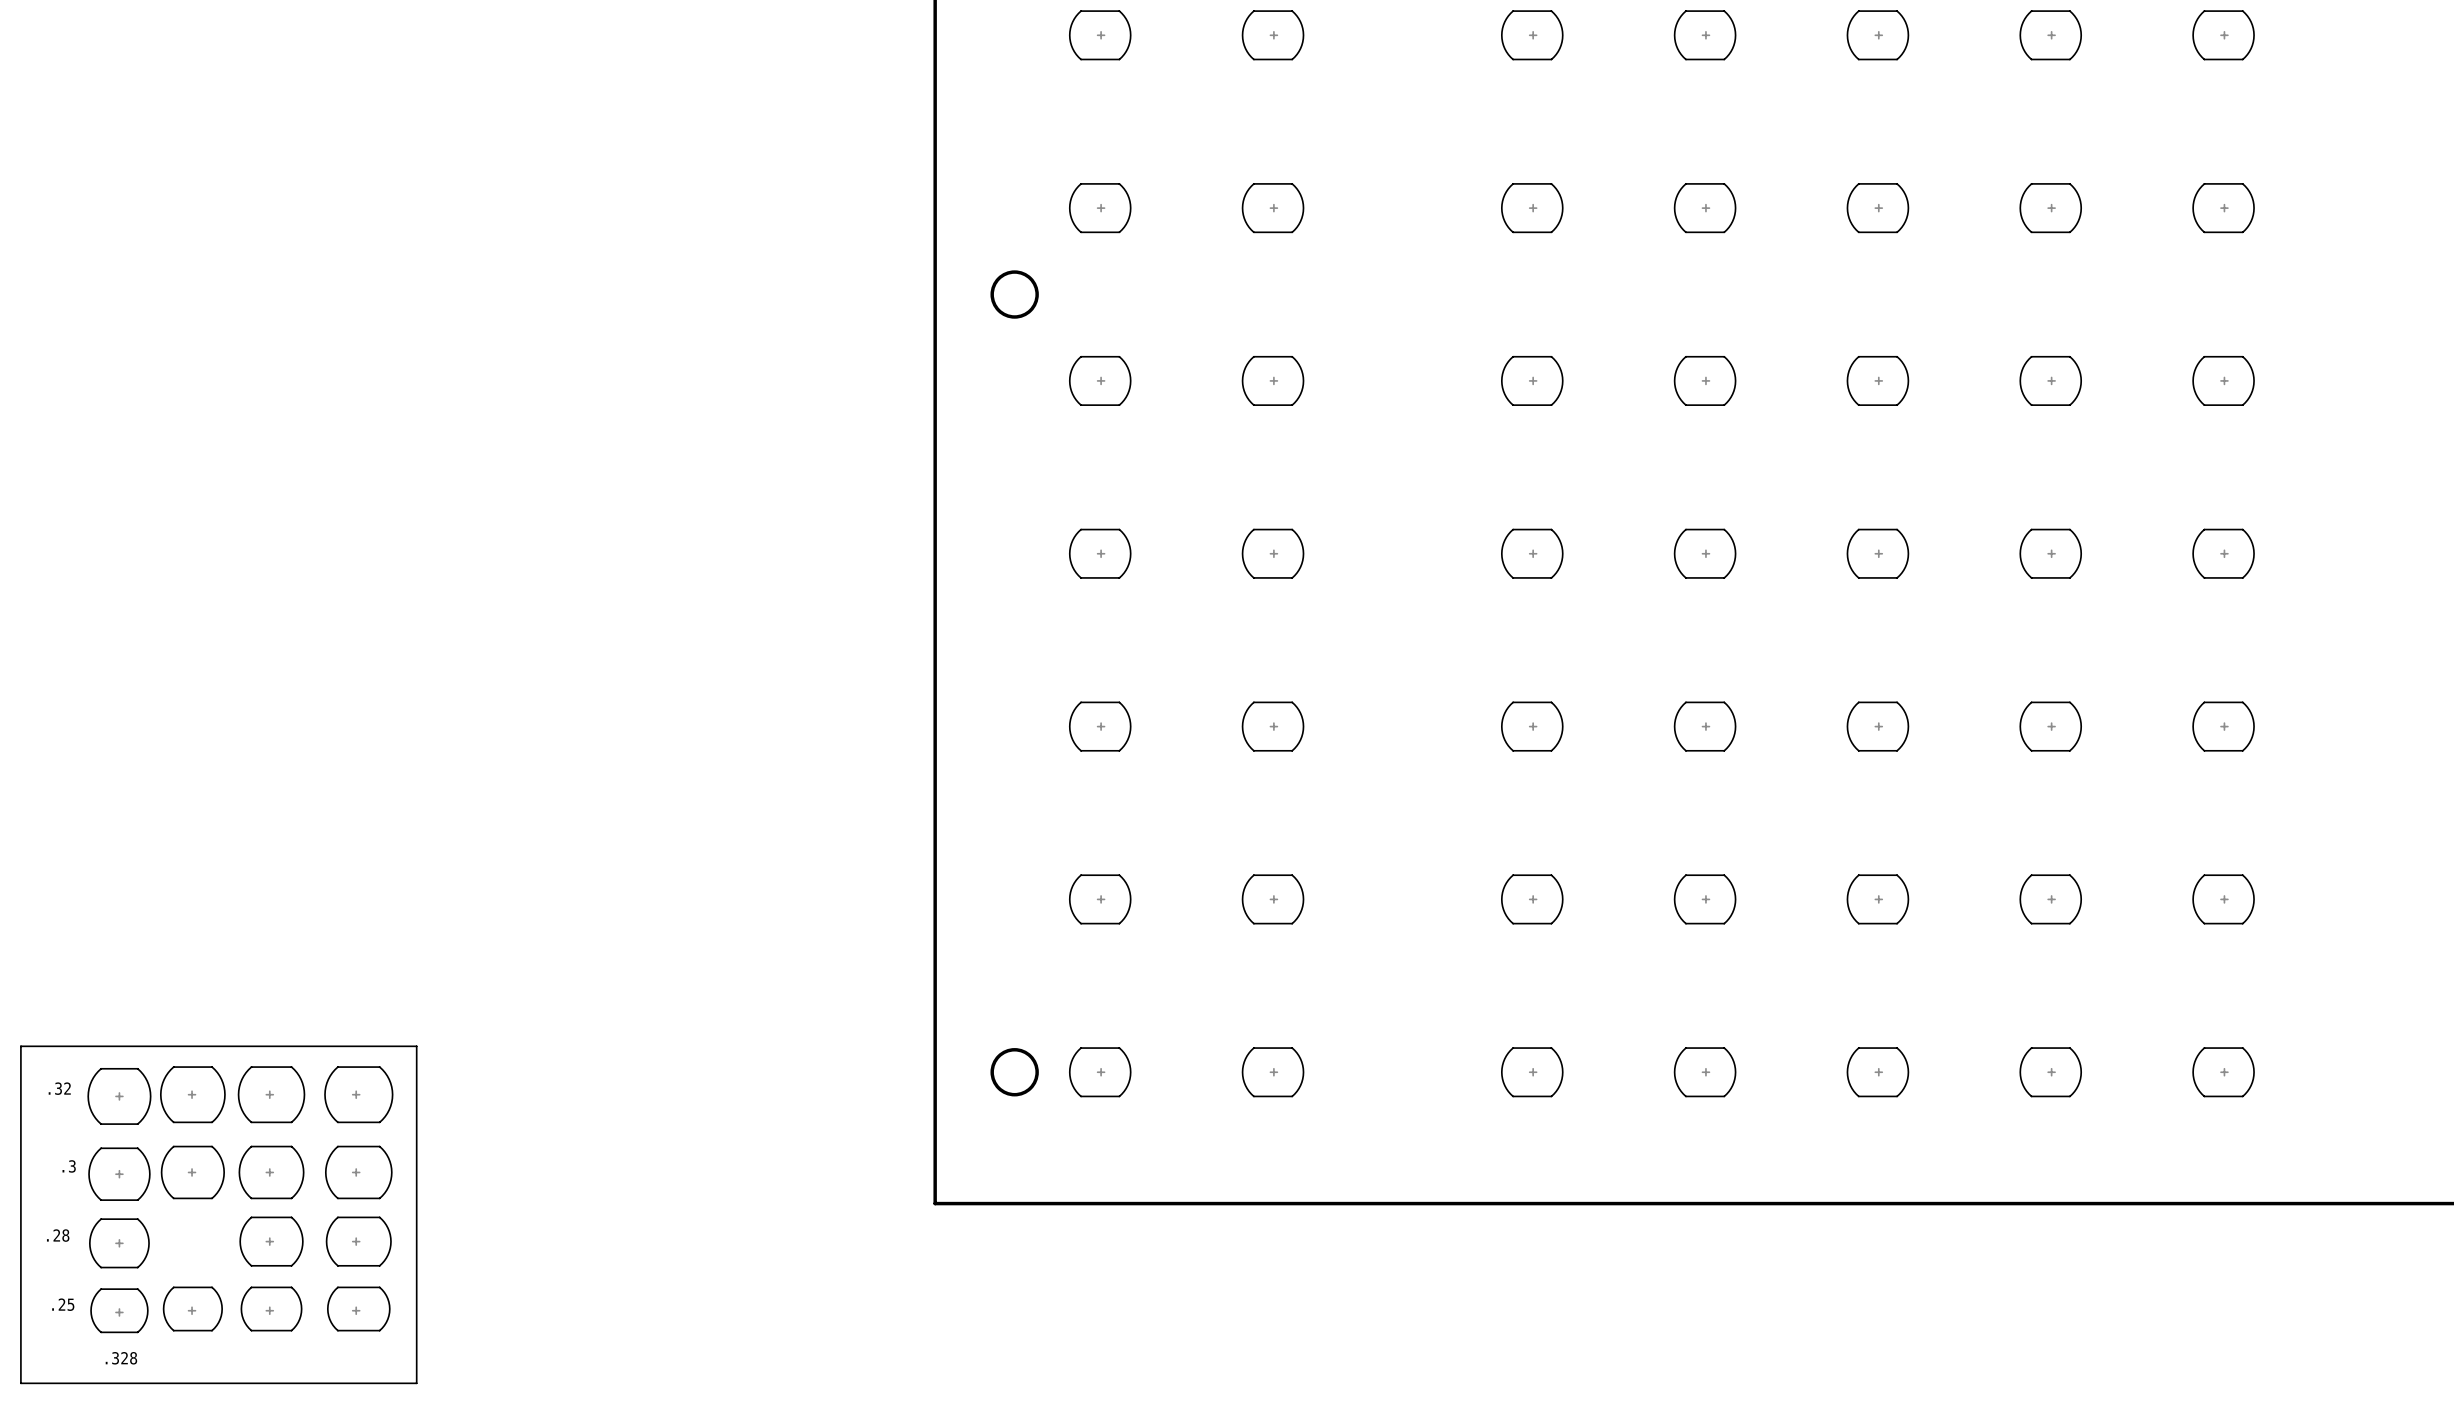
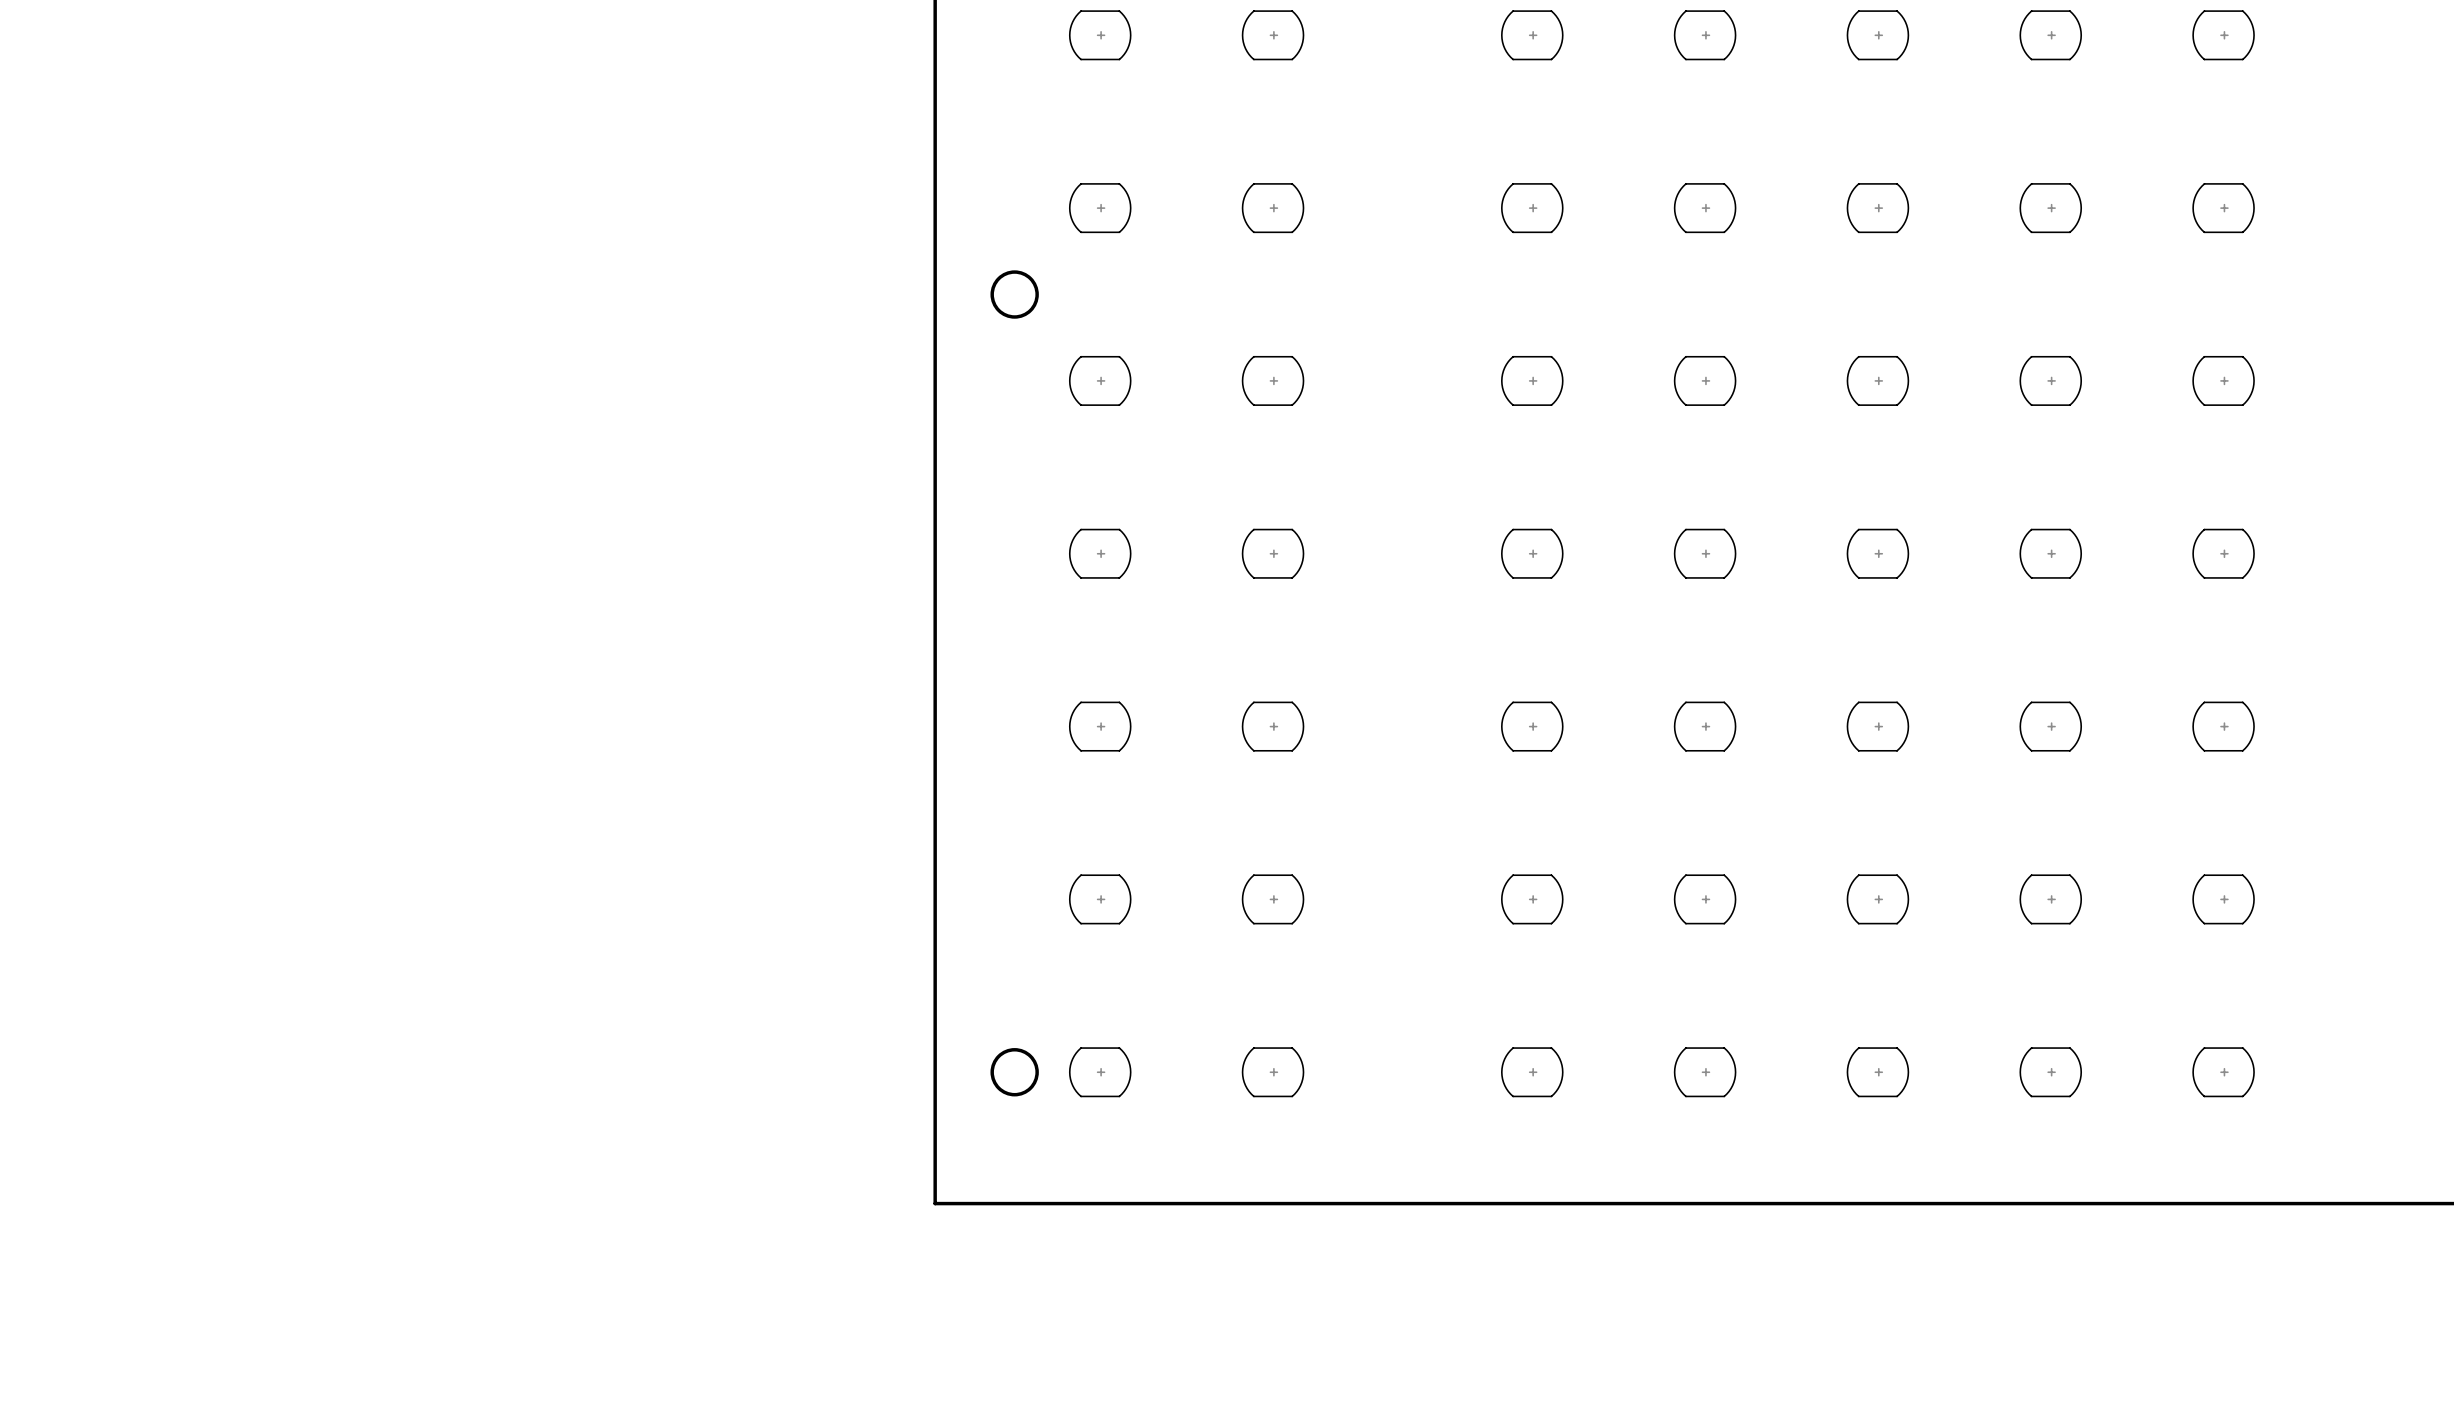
board edge: (20, 1046) (20, 1383) (416, 1383) (416, 1046) (20, 1046) -> none
board edge: (173, 1067) (212, 1067) (217, 1072) (224, 1086) (224, 1098) (219, 1113) (212, 1122) (173, 1122) (168, 1116) (161, 1102) (161, 1090) (166, 1075) (173, 1067) -> none
board edge: (251, 1067) (291, 1067) (297, 1072) (303, 1086) (304, 1098) (299, 1113) (291, 1122) (251, 1122) (246, 1116) (239, 1102) (238, 1090) (243, 1075) (251, 1067) -> none
board edge: (337, 1067) (379, 1067) (385, 1072) (391, 1086) (392, 1098) (387, 1113) (379, 1122) (337, 1122) (332, 1116) (325, 1102) (325, 1090) (330, 1075) (337, 1067) -> none
board edge: (101, 1068) (137, 1068) (145, 1077) (149, 1088) (149, 1104) (145, 1115) (137, 1124) (101, 1124) (93, 1115) (89, 1104) (89, 1088) (93, 1077) (101, 1068) -> none
text: .32 (59, 1088) -> none
line: (192, 1091) (192, 1098) -> none
line: (269, 1091) (269, 1098) -> none
line: (356, 1091) (356, 1098) -> none
line: (119, 1092) (119, 1099) -> none
line: (188, 1094) (195, 1094) -> none
line: (266, 1094) (273, 1094) -> none
line: (352, 1094) (359, 1094) -> none
line: (115, 1096) (122, 1096) -> none
board edge: (173, 1146) (212, 1146) (217, 1151) (222, 1161) (223, 1176) (219, 1190) (212, 1198) (173, 1198) (168, 1193) (163, 1183) (161, 1168) (166, 1154) (173, 1146) -> none
board edge: (251, 1146) (291, 1146) (296, 1151) (301, 1161) (303, 1176) (298, 1190) (291, 1198) (251, 1198) (246, 1193) (241, 1183) (239, 1168) (244, 1154) (251, 1146) -> none
board edge: (337, 1146) (379, 1146) (384, 1151) (390, 1161) (391, 1176) (386, 1190) (379, 1198) (337, 1198) (332, 1193) (327, 1183) (325, 1168) (330, 1154) (337, 1146) -> none
board edge: (101, 1148) (137, 1148) (142, 1153) (148, 1163) (149, 1177) (144, 1191) (137, 1200) (101, 1200) (96, 1194) (90, 1185) (89, 1170) (93, 1156) (101, 1148) -> none
text: .3 (69, 1166) -> none
line: (192, 1169) (192, 1175) -> none
line: (269, 1169) (269, 1175) -> none
line: (356, 1169) (356, 1175) -> none
line: (119, 1170) (119, 1177) -> none
line: (188, 1172) (195, 1172) -> none
line: (266, 1172) (273, 1172) -> none
line: (352, 1172) (359, 1172) -> none
line: (115, 1174) (122, 1174) -> none
board edge: (251, 1217) (291, 1217) (296, 1222) (302, 1234) (302, 1245) (298, 1257) (291, 1265) (251, 1265) (246, 1260) (240, 1248) (240, 1238) (244, 1225) (251, 1217) -> none
board edge: (337, 1217) (379, 1217) (382, 1219) (388, 1228) (390, 1241) (388, 1254) (379, 1265) (337, 1265) (335, 1263) (329, 1254) (326, 1241) (329, 1228) (337, 1217) -> none
board edge: (101, 1219) (137, 1219) (142, 1224) (148, 1236) (148, 1246) (144, 1259) (137, 1267) (101, 1267) (96, 1262) (90, 1250) (90, 1239) (94, 1226) (101, 1219) -> none
text: .28 (58, 1235) -> none
line: (269, 1238) (269, 1245) -> none
line: (356, 1238) (356, 1245) -> none
line: (119, 1239) (119, 1246) -> none
line: (266, 1241) (273, 1241) -> none
line: (352, 1241) (359, 1241) -> none
line: (115, 1243) (122, 1243) -> none
board edge: (173, 1287) (212, 1287) (214, 1289) (221, 1302) (221, 1312) (218, 1322) (212, 1330) (173, 1330) (171, 1328) (164, 1315) (163, 1305) (167, 1295) (173, 1287) -> none
board edge: (251, 1287) (291, 1287) (294, 1289) (299, 1298) (301, 1309) (299, 1319) (294, 1328) (291, 1330) (251, 1330) (248, 1328) (242, 1315) (241, 1305) (244, 1295) (251, 1287) -> none
board edge: (337, 1287) (379, 1287) (386, 1295) (389, 1305) (388, 1315) (382, 1328) (379, 1330) (337, 1330) (331, 1322) (327, 1309) (331, 1295) (337, 1287) -> none
board edge: (101, 1289) (137, 1289) (140, 1291) (146, 1303) (147, 1314) (144, 1324) (137, 1332) (101, 1332) (98, 1329) (91, 1317) (91, 1307) (94, 1297) (101, 1289) -> none
text: .25 (63, 1304) -> none
line: (192, 1307) (192, 1314) -> none
line: (269, 1307) (269, 1314) -> none
line: (356, 1307) (356, 1314) -> none
line: (119, 1309) (119, 1315) -> none
line: (188, 1310) (195, 1310) -> none
line: (266, 1310) (273, 1310) -> none
line: (352, 1310) (359, 1310) -> none
line: (115, 1312) (122, 1312) -> none
text: .328 (121, 1358) -> none

